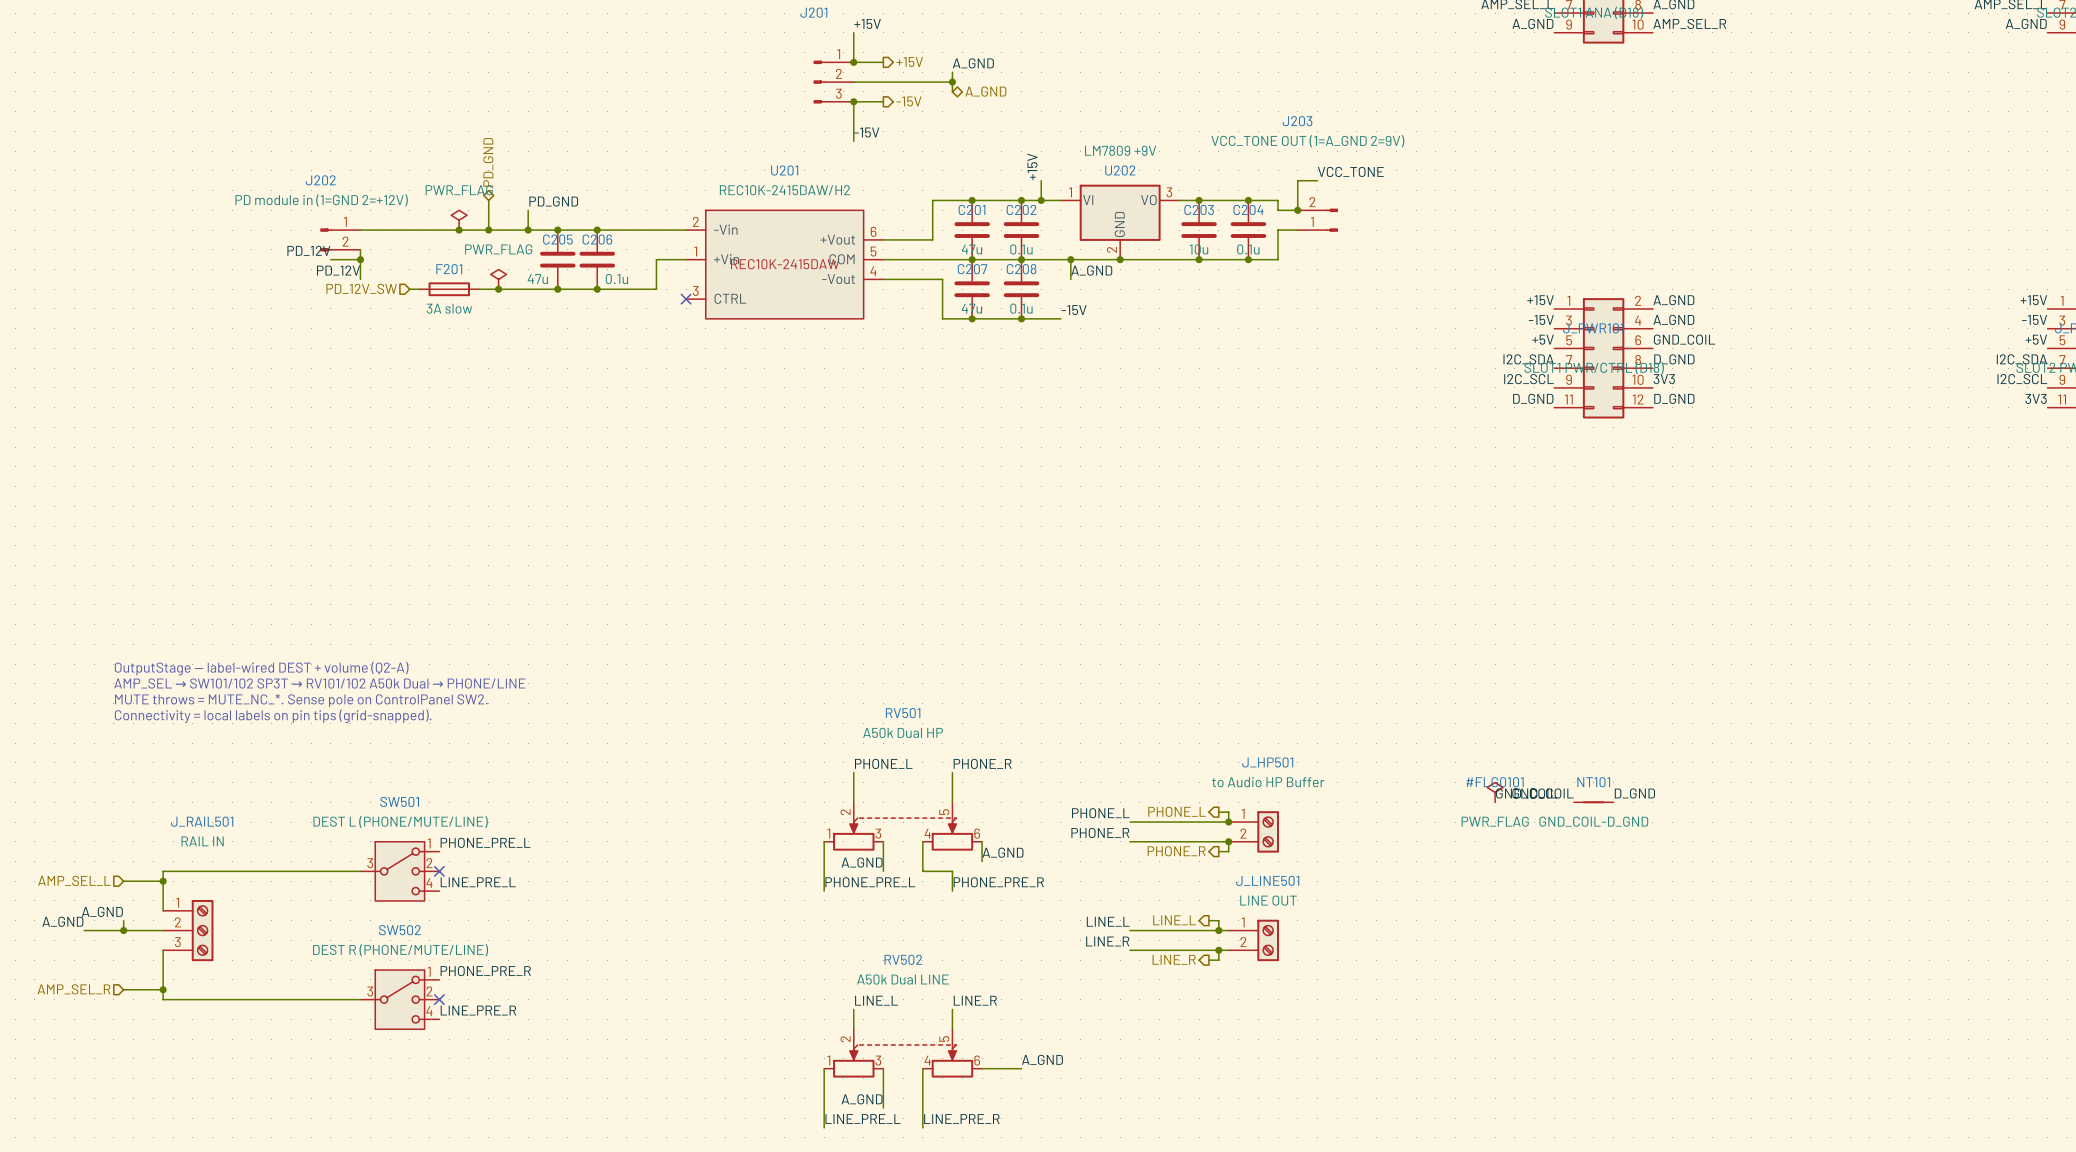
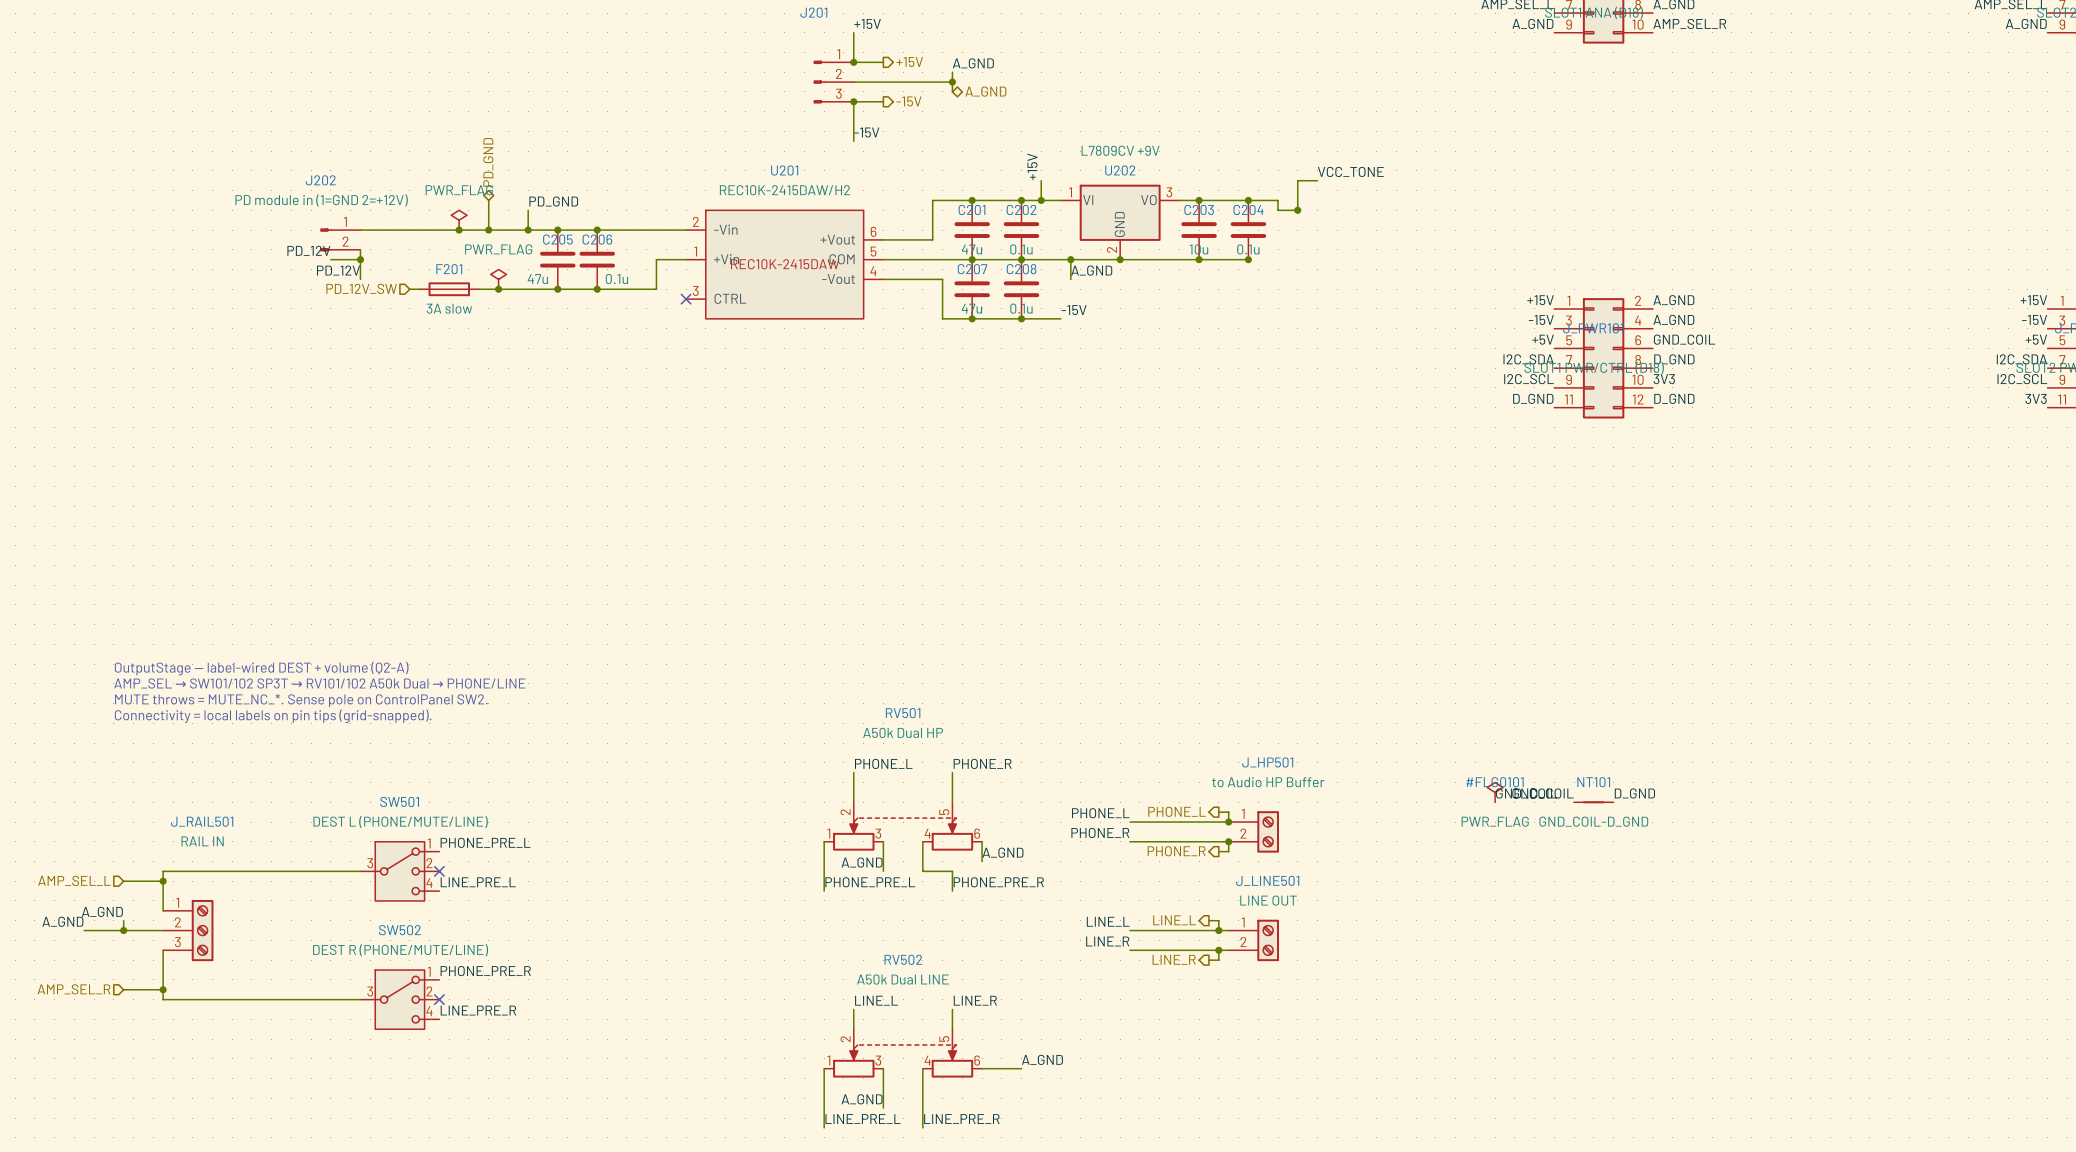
U202 value: LM7809 +9V (1120, 150) -> L7809CV +9V (1120, 150)
J203: VCC_TONE OUT (1=A_GND 2=9V) (1317, 220) -> none
wire: (1297, 230) (1278, 230) (1278, 259) (1248, 259) -> none

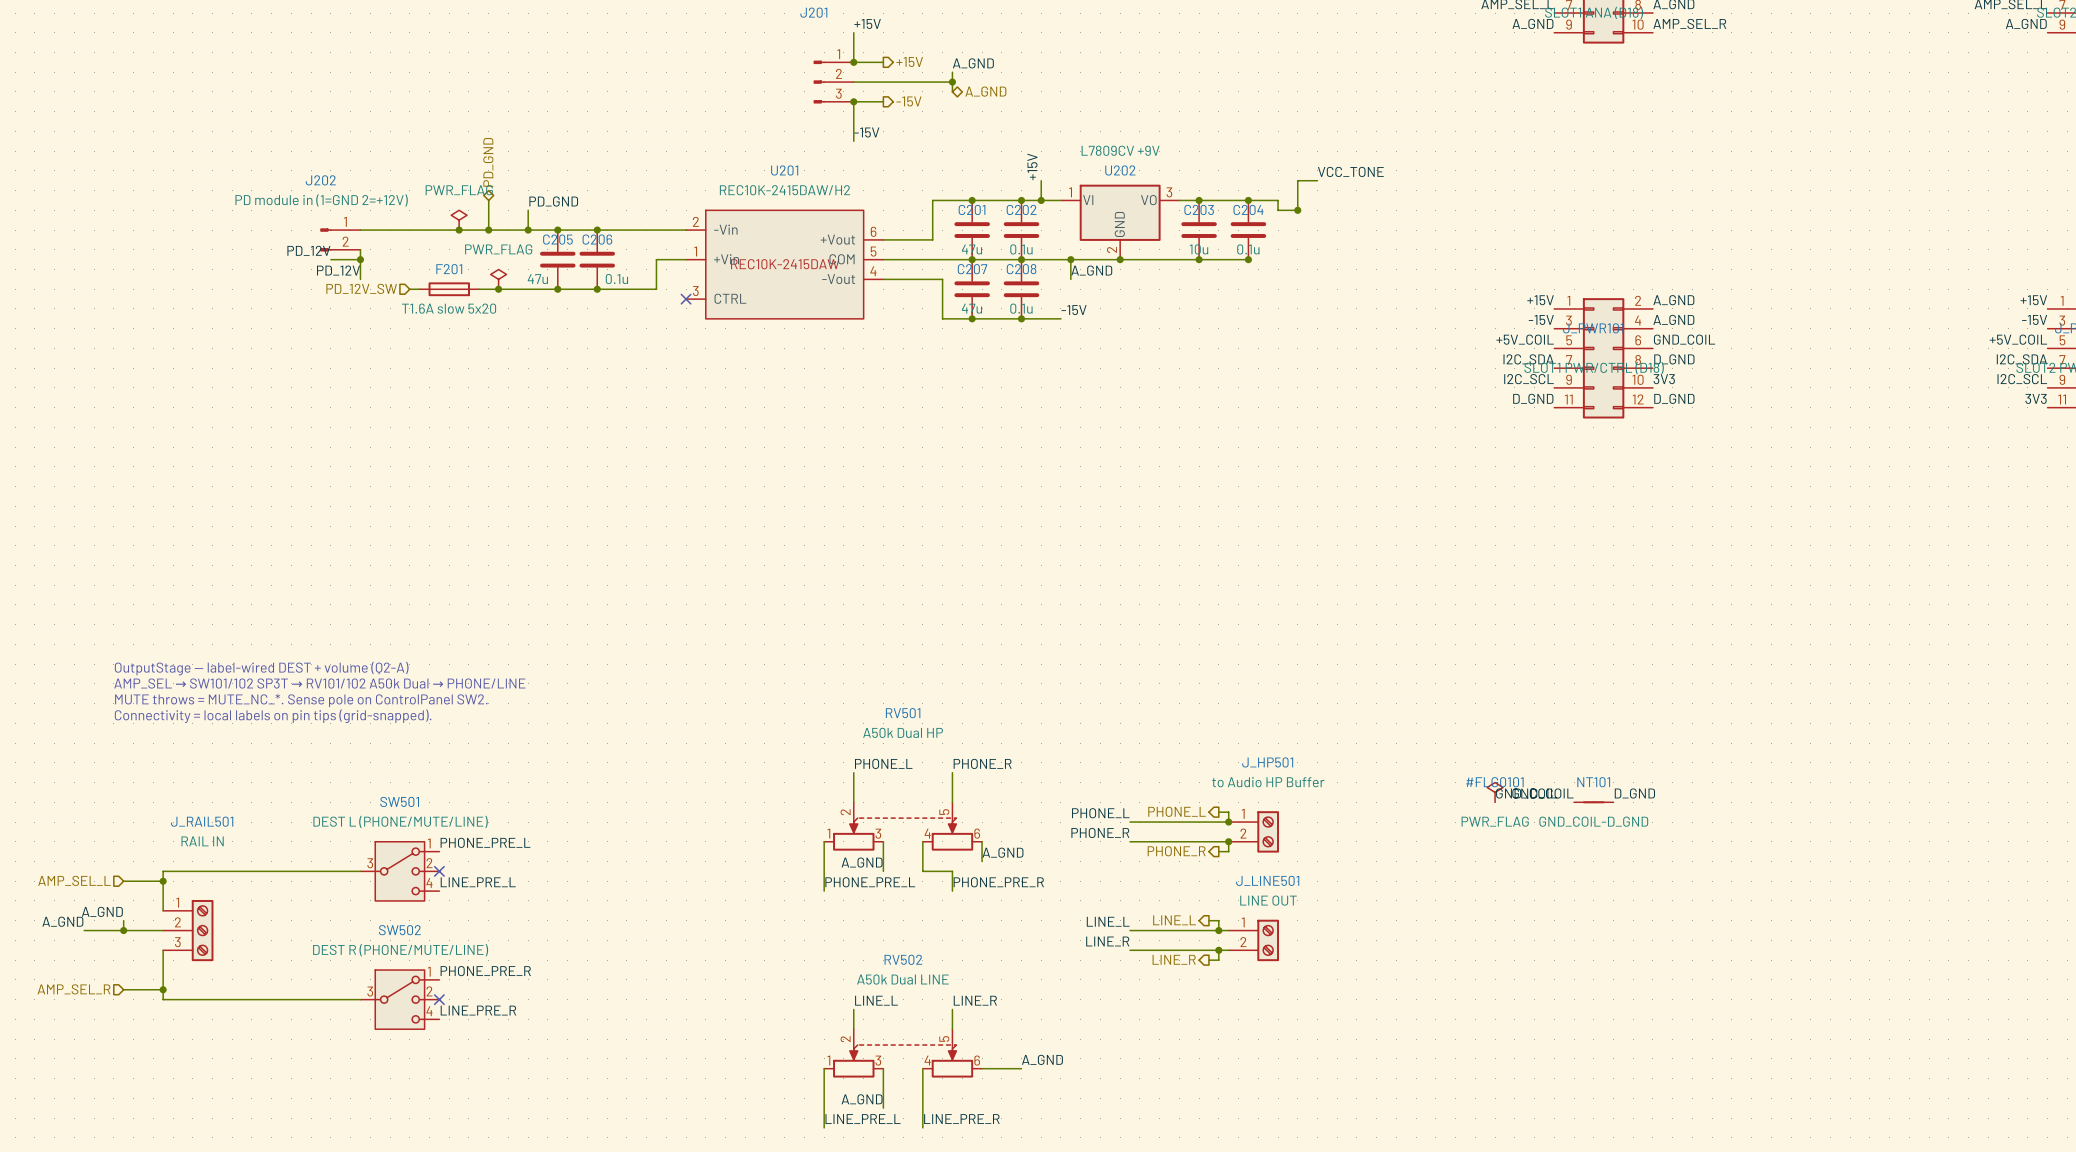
F201 value: 3A slow (449, 308) -> T1.6A slow 5x20 (449, 308)
label: +5V (1543, 339) -> +5V_COIL (1525, 339)
label: +5V (2036, 339) -> +5V_COIL (2018, 339)

